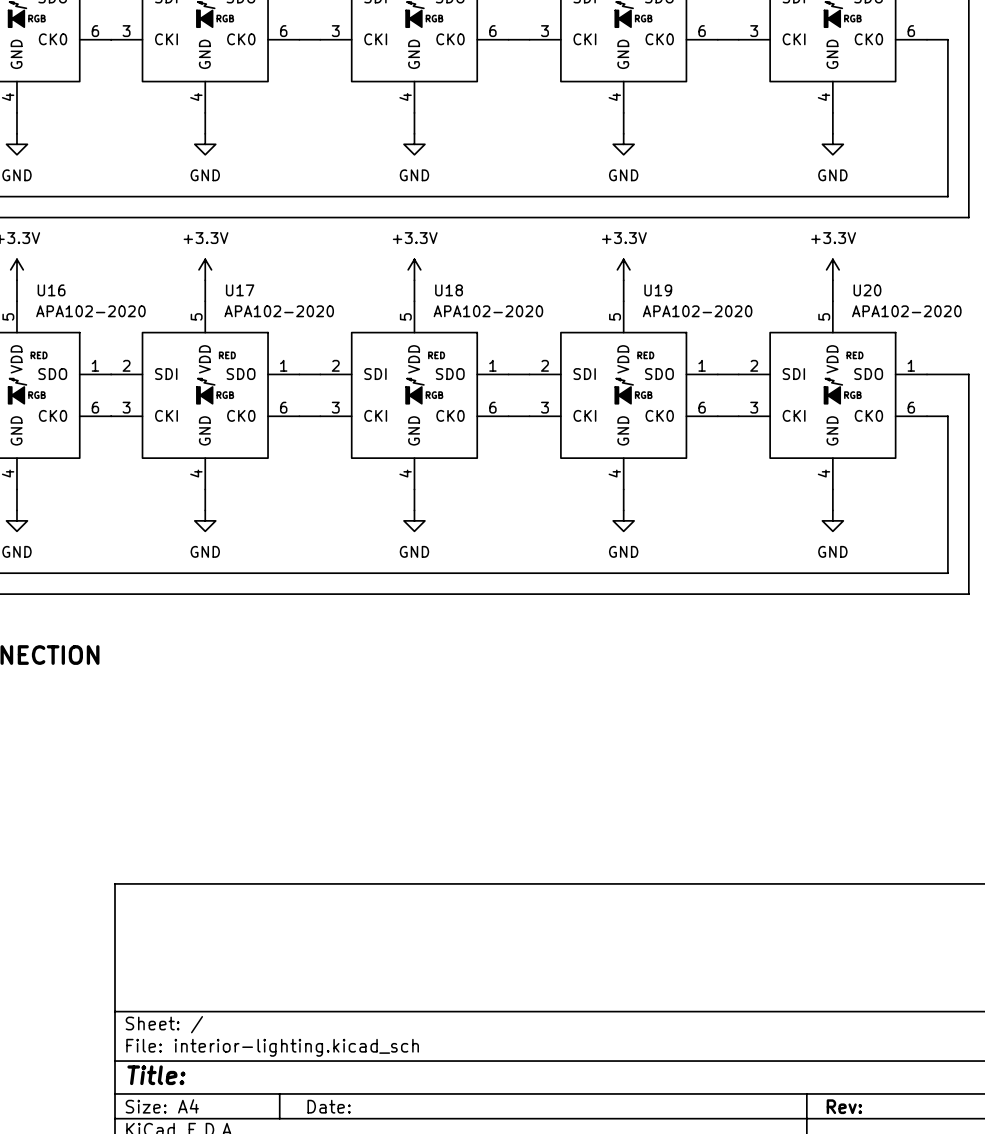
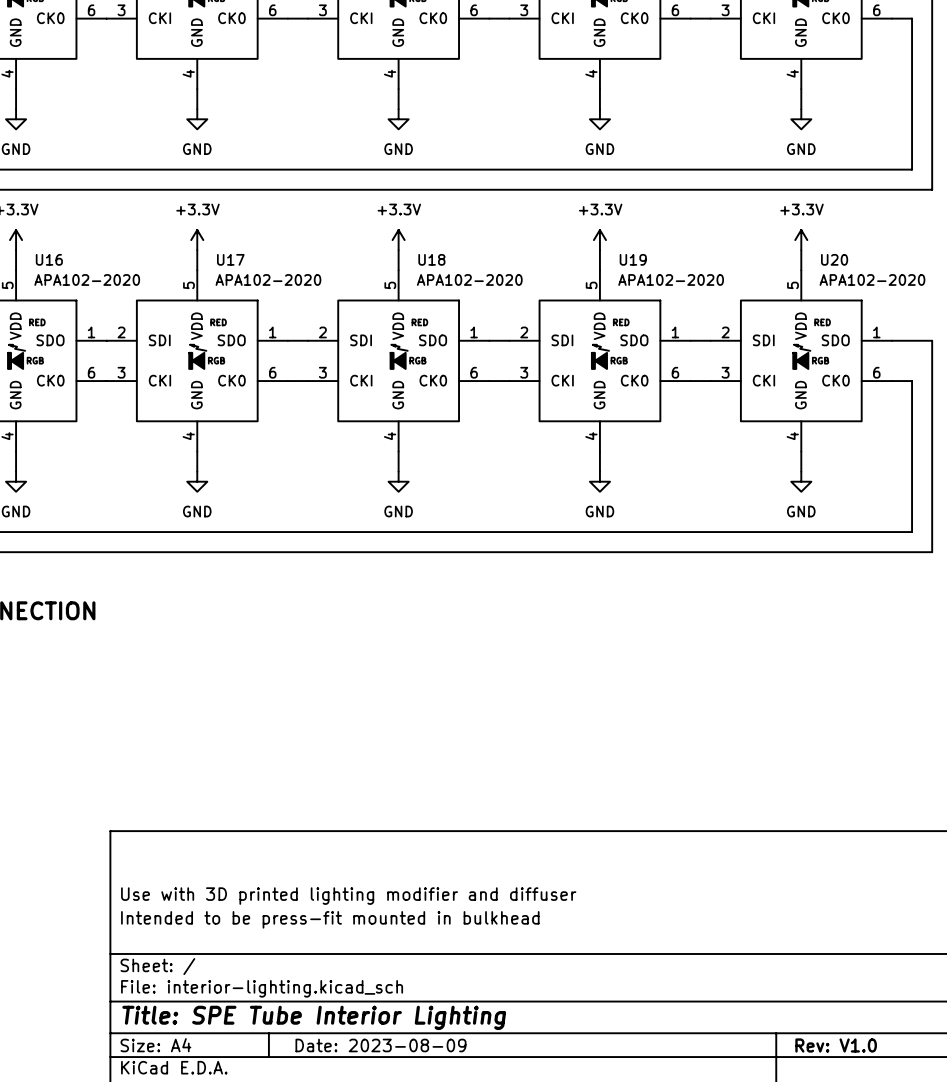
title block: none -> Use with 3D printed lighting modifier and diffuser (348, 896)
title block: none -> Intended to be press-fit mounted in bulkhead (330, 919)
title block: Title: (156, 1075) -> Title: SPE Tube Interior Lighting (314, 1017)
title block: Date: (329, 1106) -> Date: 2023-08-09 (380, 1045)
title block: Rev: (844, 1106) -> Rev: V1.0 (836, 1045)

